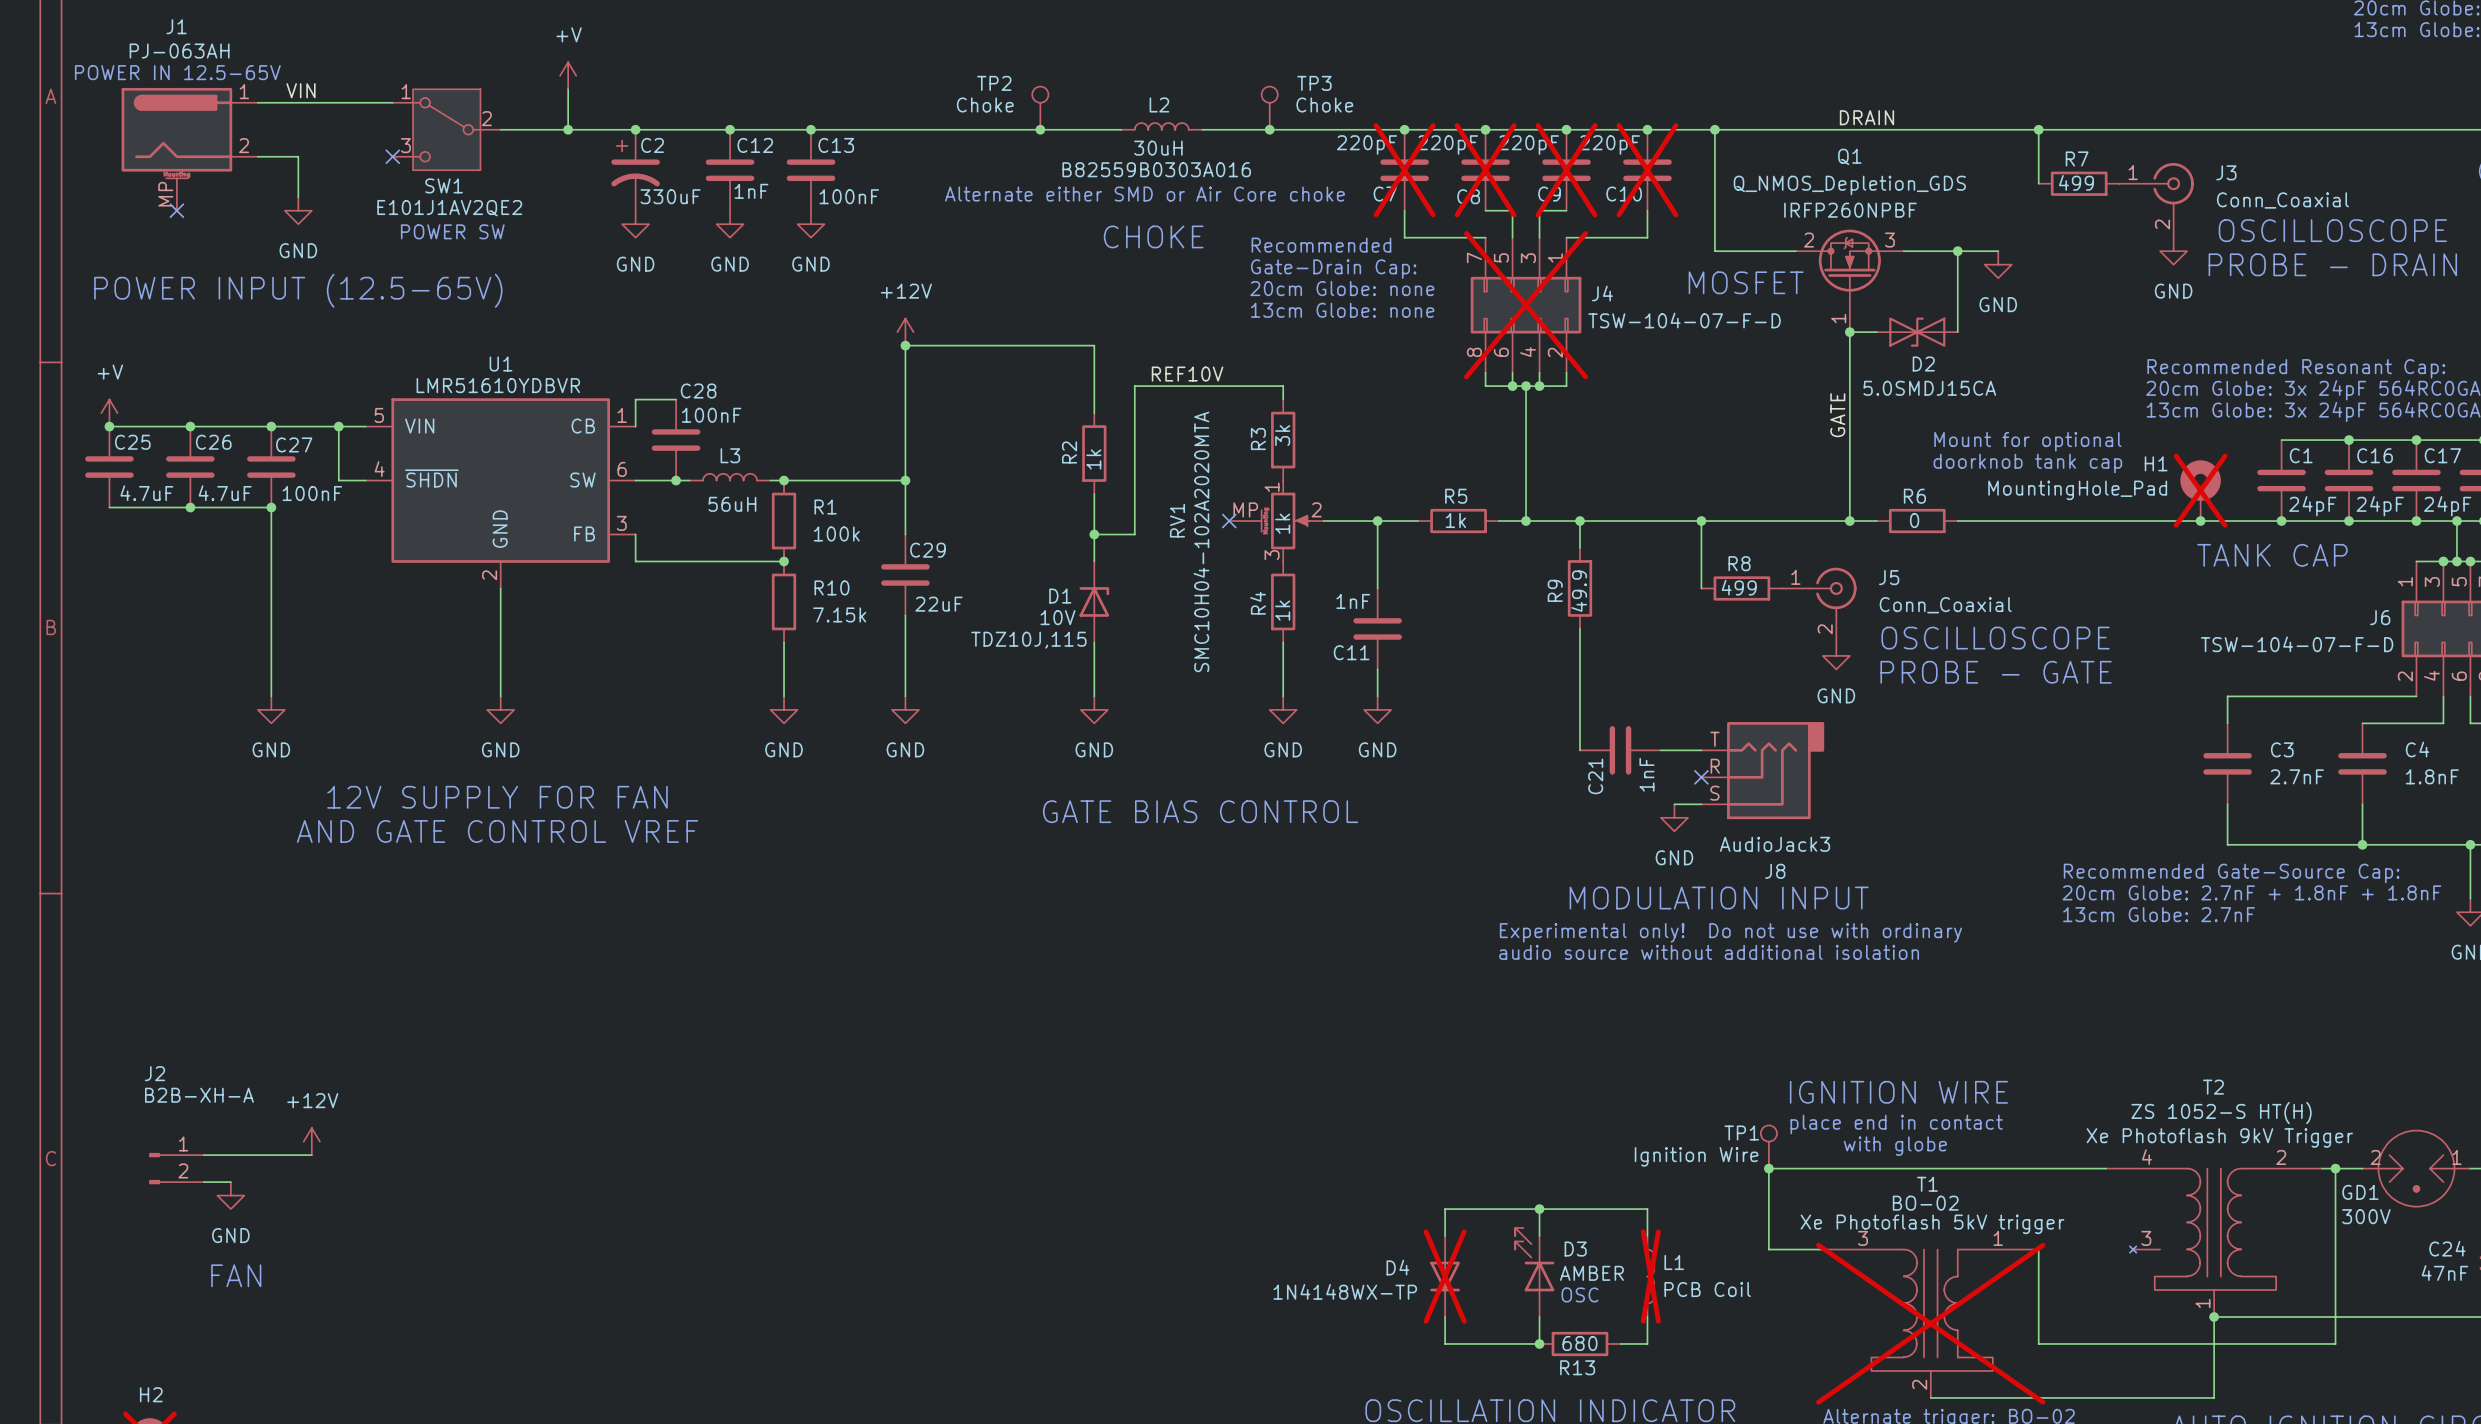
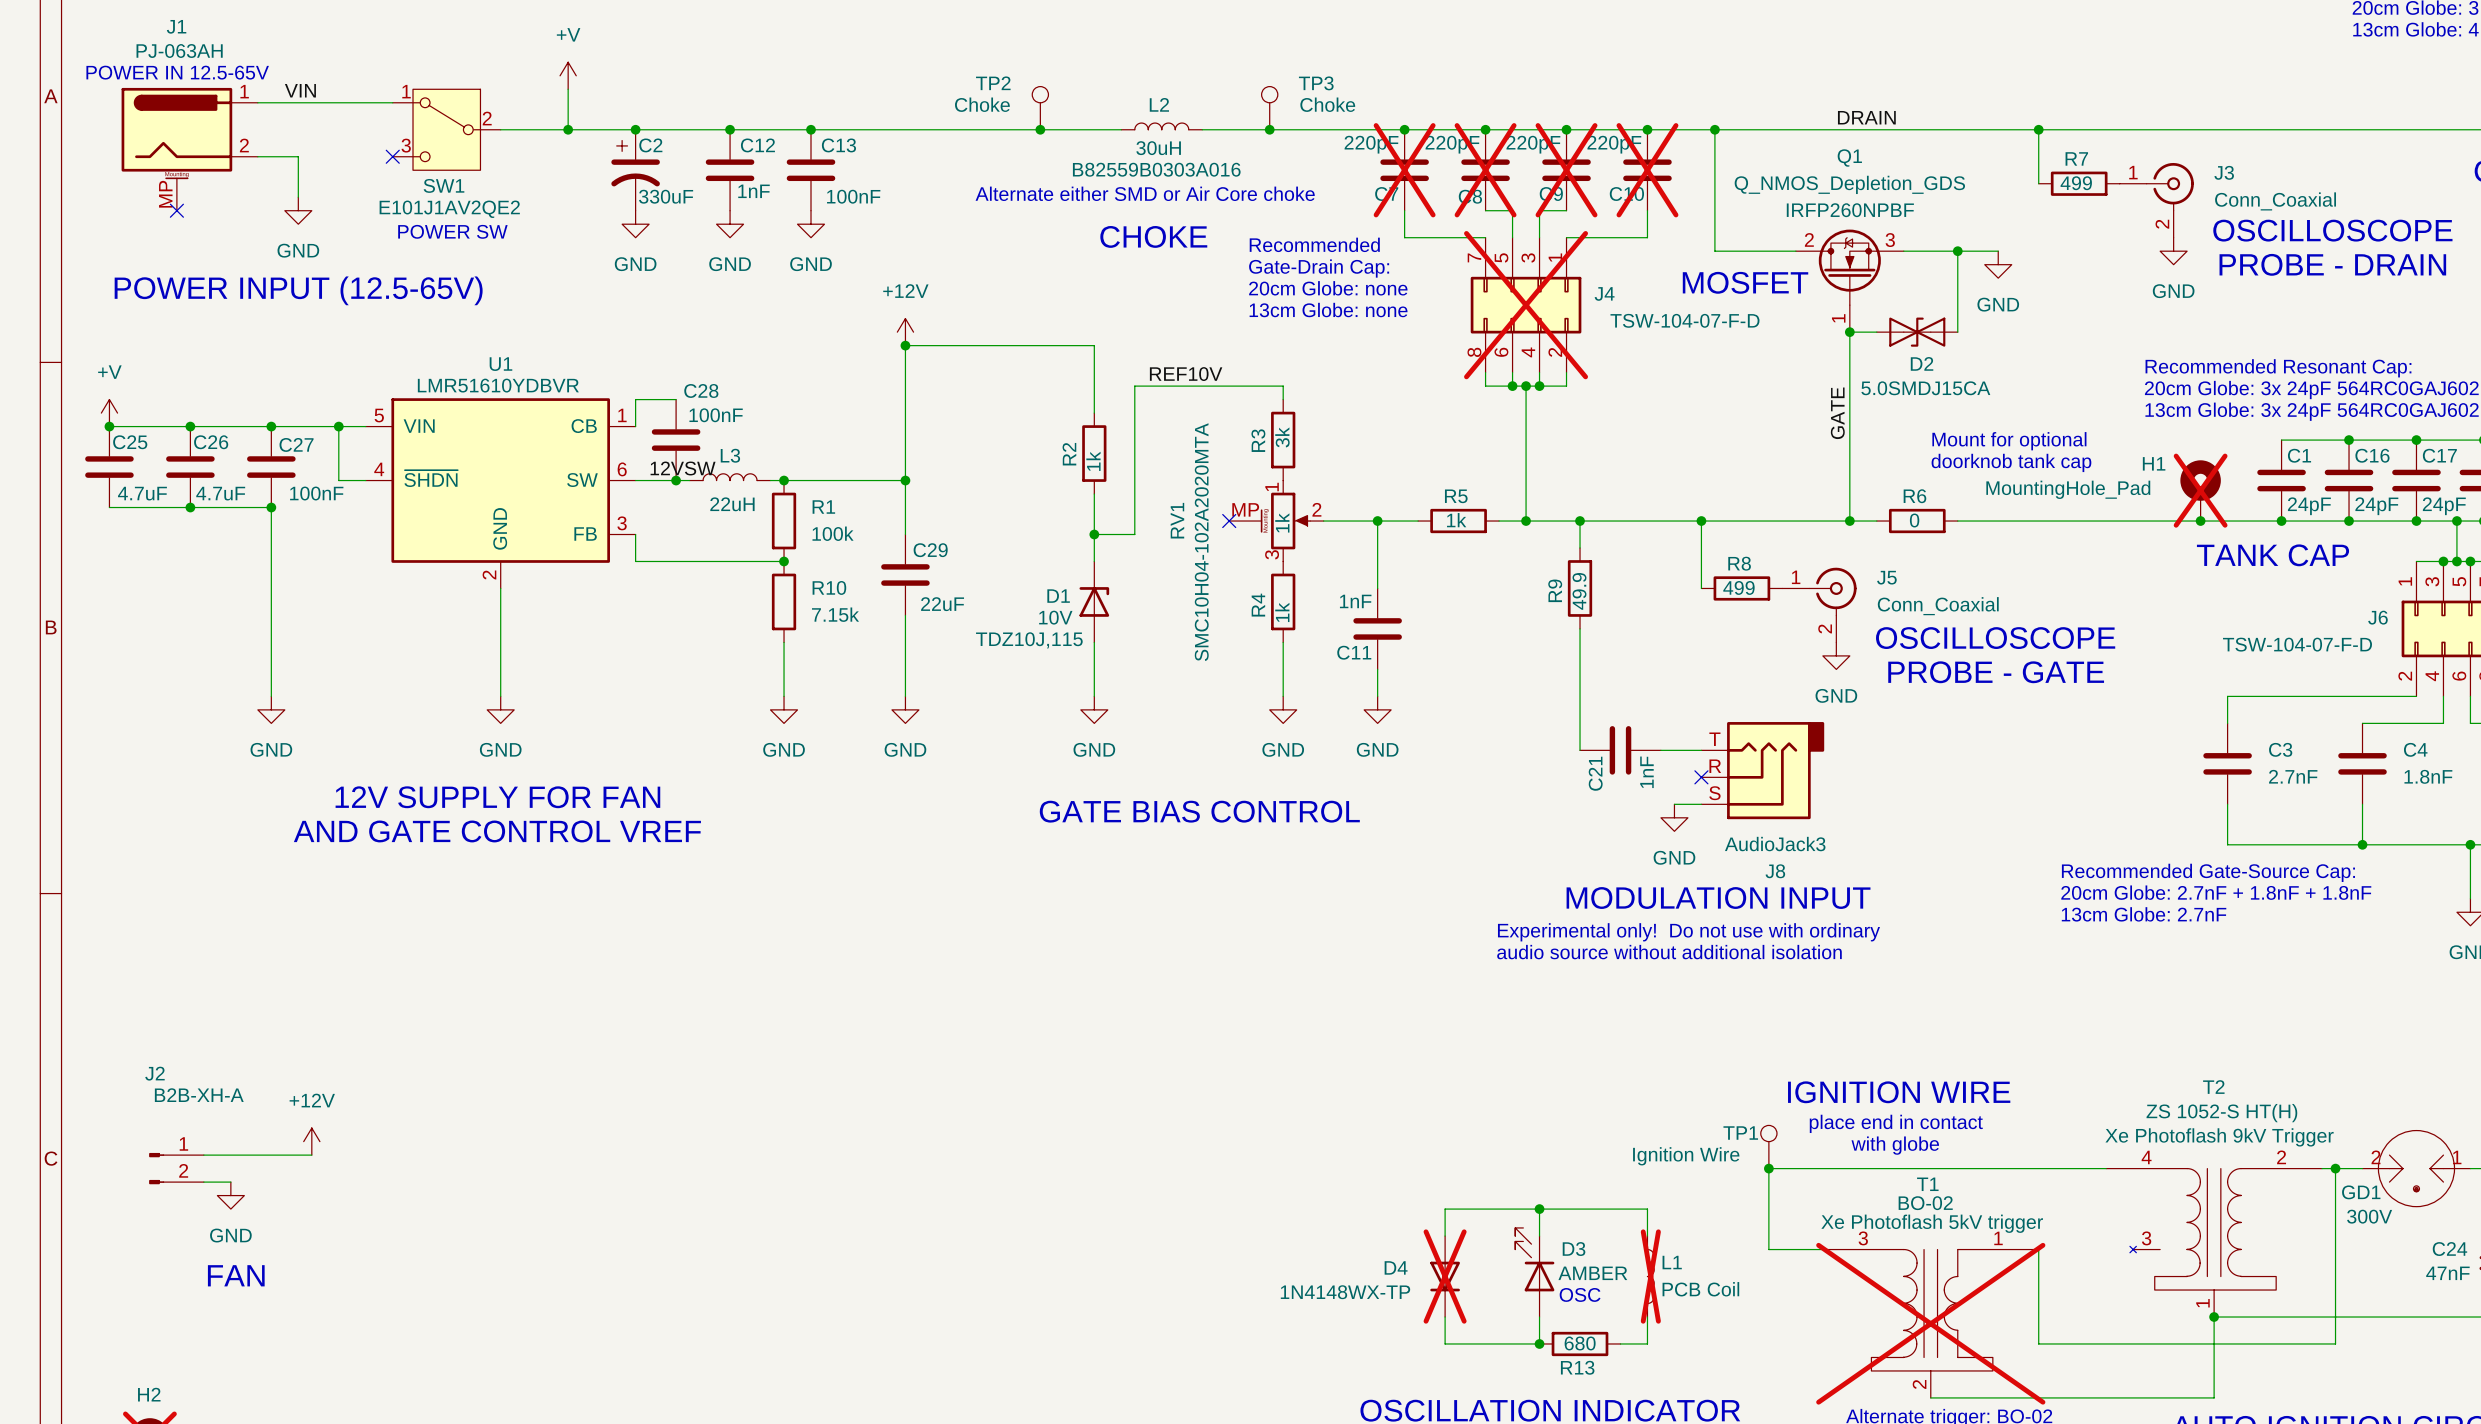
label: none -> 12VSW (683, 468)
L3 value: 56uH (732, 504) -> 22uH (732, 504)

